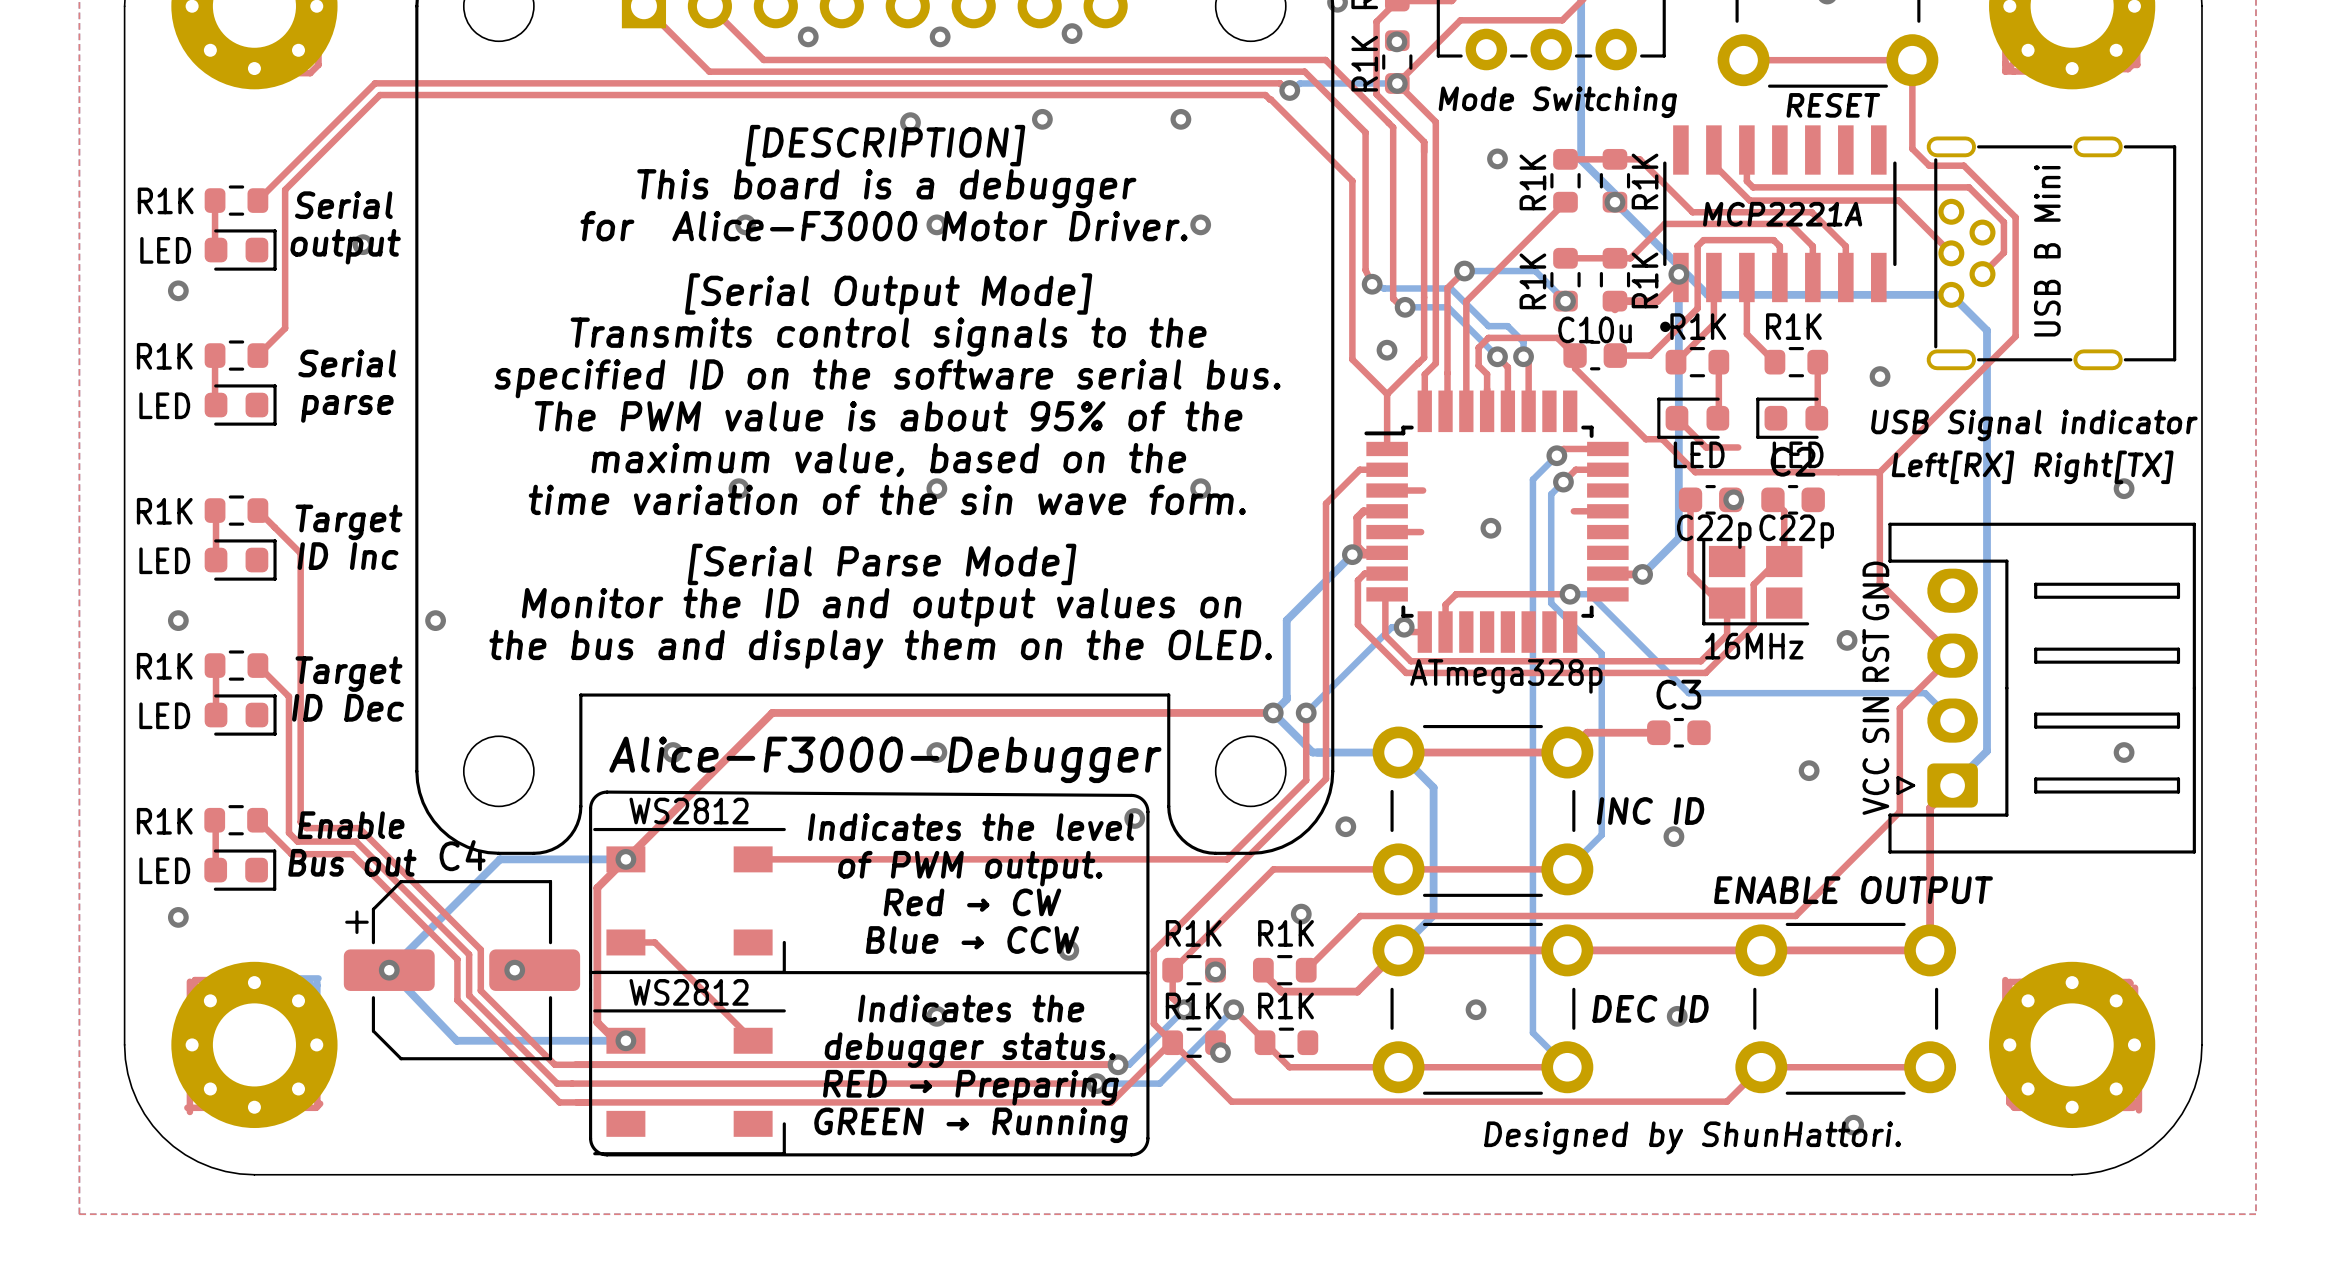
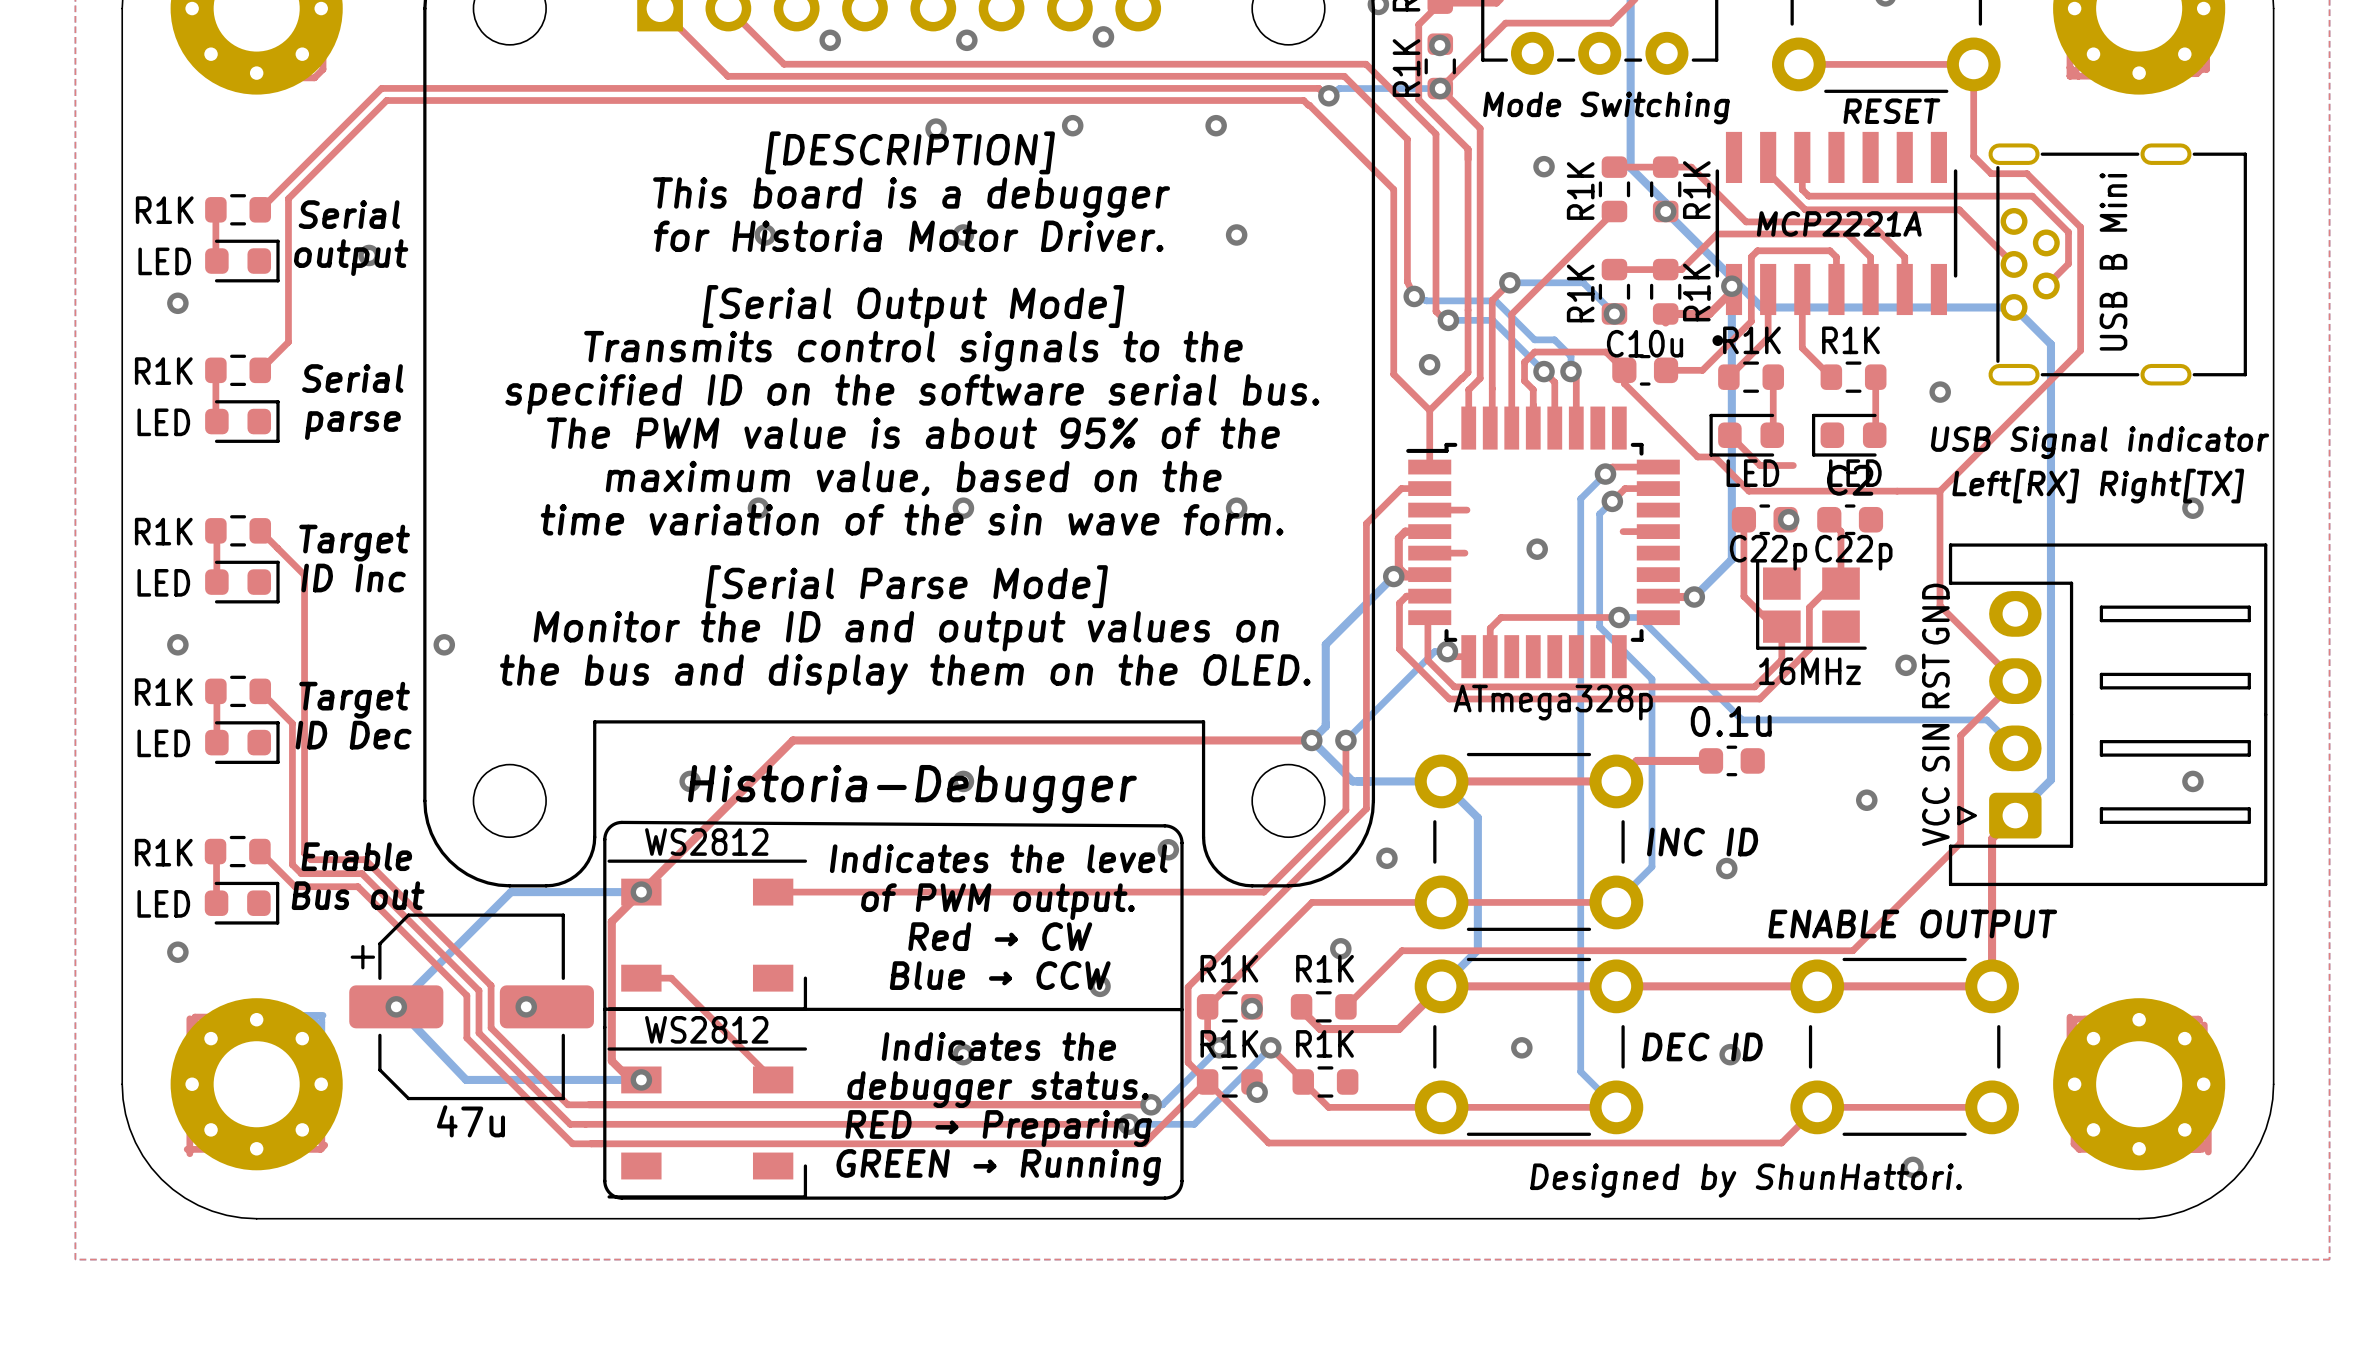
text: for Alice-F3000 Motor Driver. (884, 226) -> for Historia Motor Driver. (908, 236)
C3 name: C3 (1678, 694) -> 0.1u (1731, 721)
text: Alice-F3000-Debugger (885, 759) -> Historia-Debugger (912, 789)
C4 name: C4 (462, 855) -> 47u (470, 1121)

